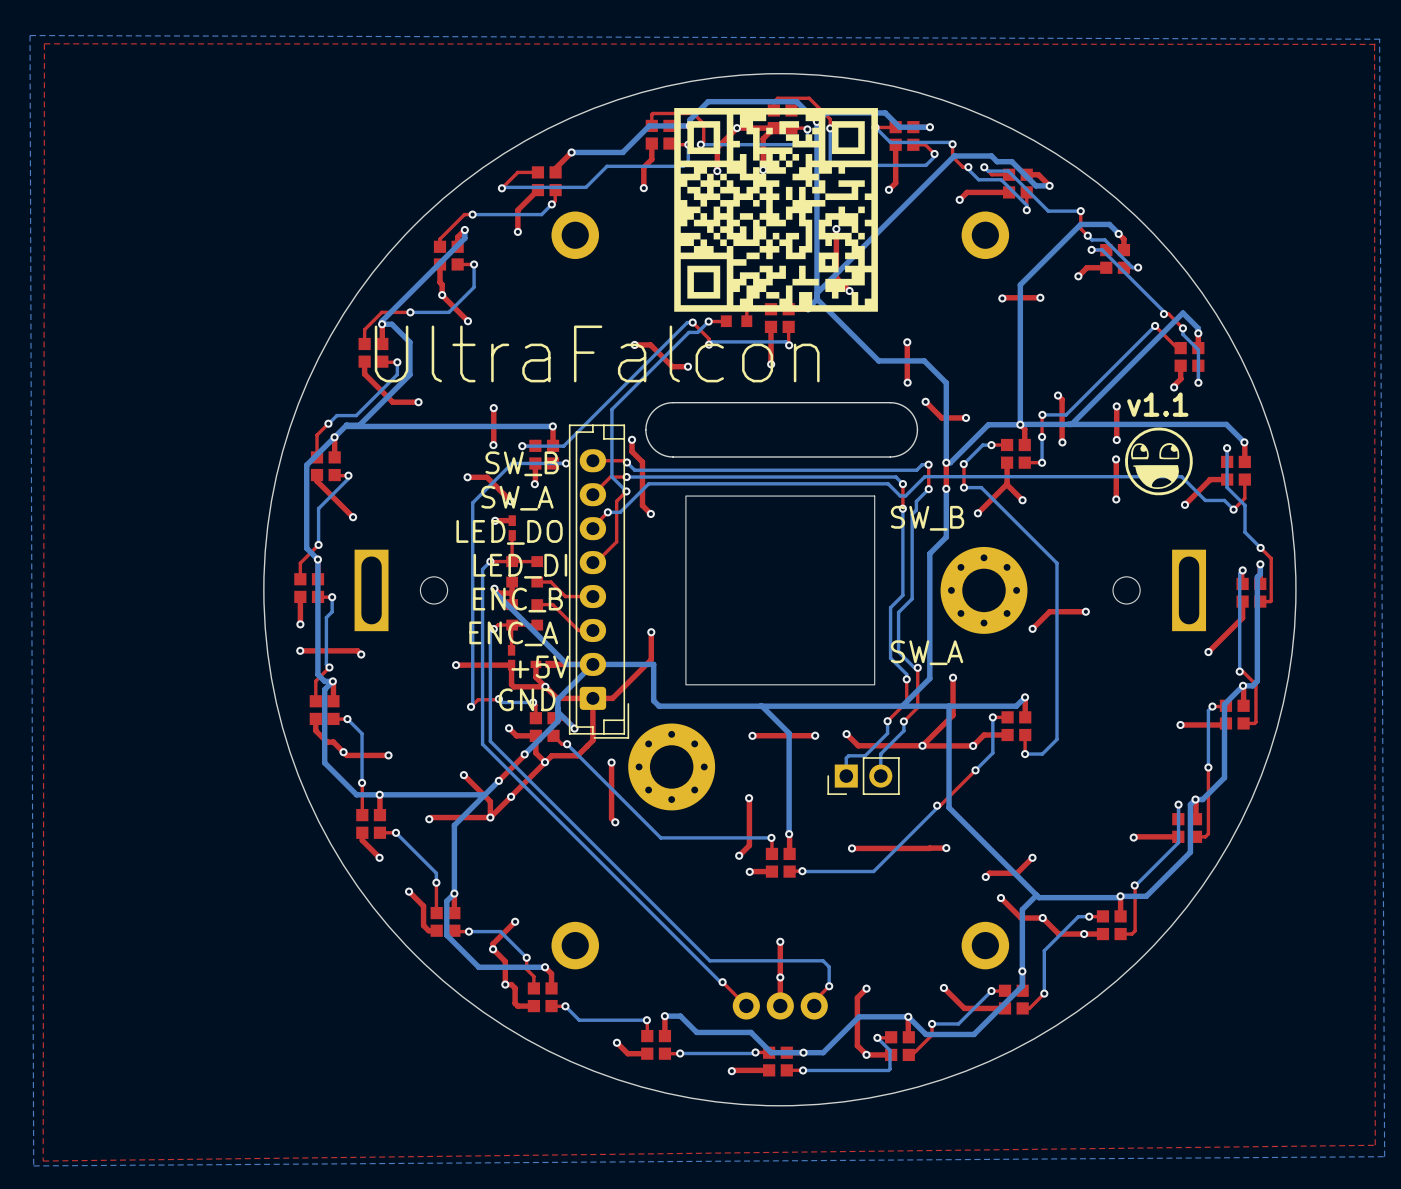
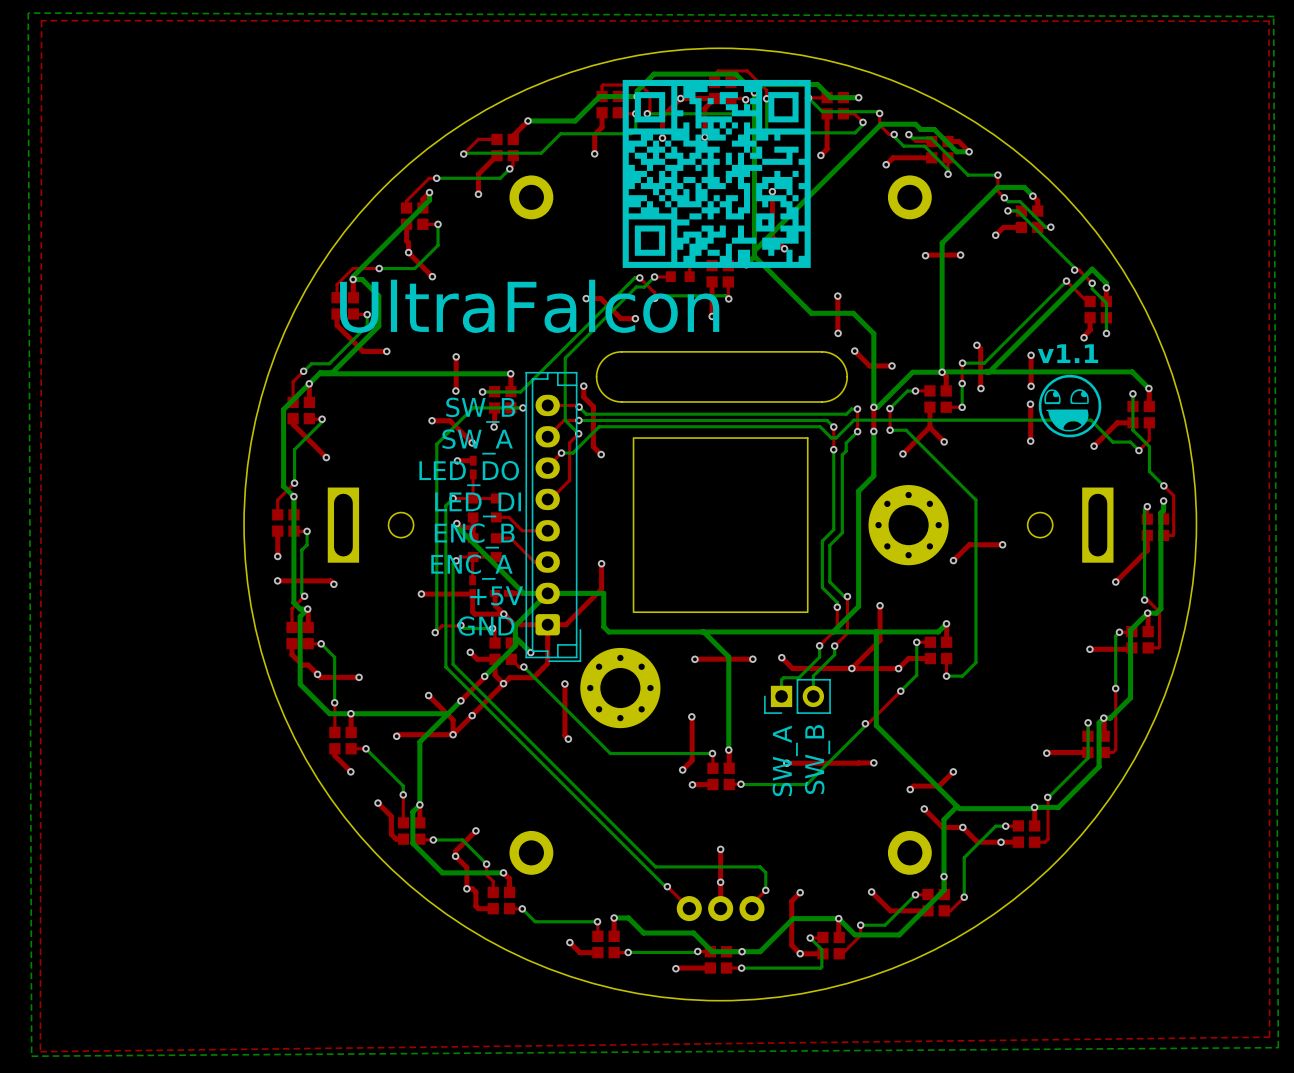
text: SW_B (927, 518) -> none
text rotation: 0° (927, 652) -> 90° counterclockwise (785, 760)
text position: SW_A (927, 652) -> SW_A (785, 760)
text: none -> SW_B (817, 759)

